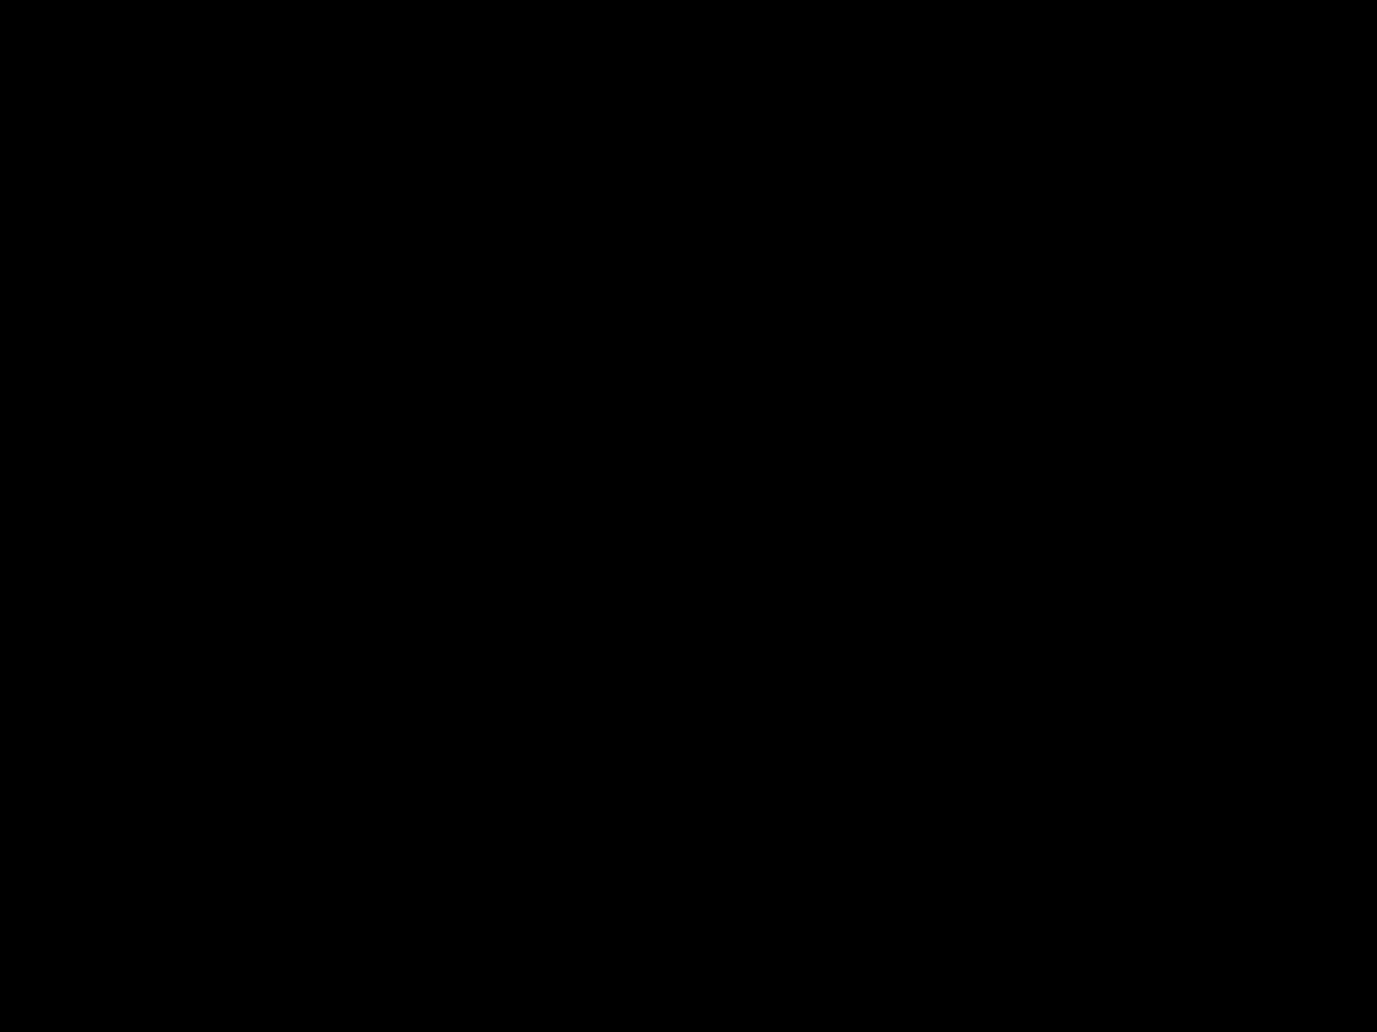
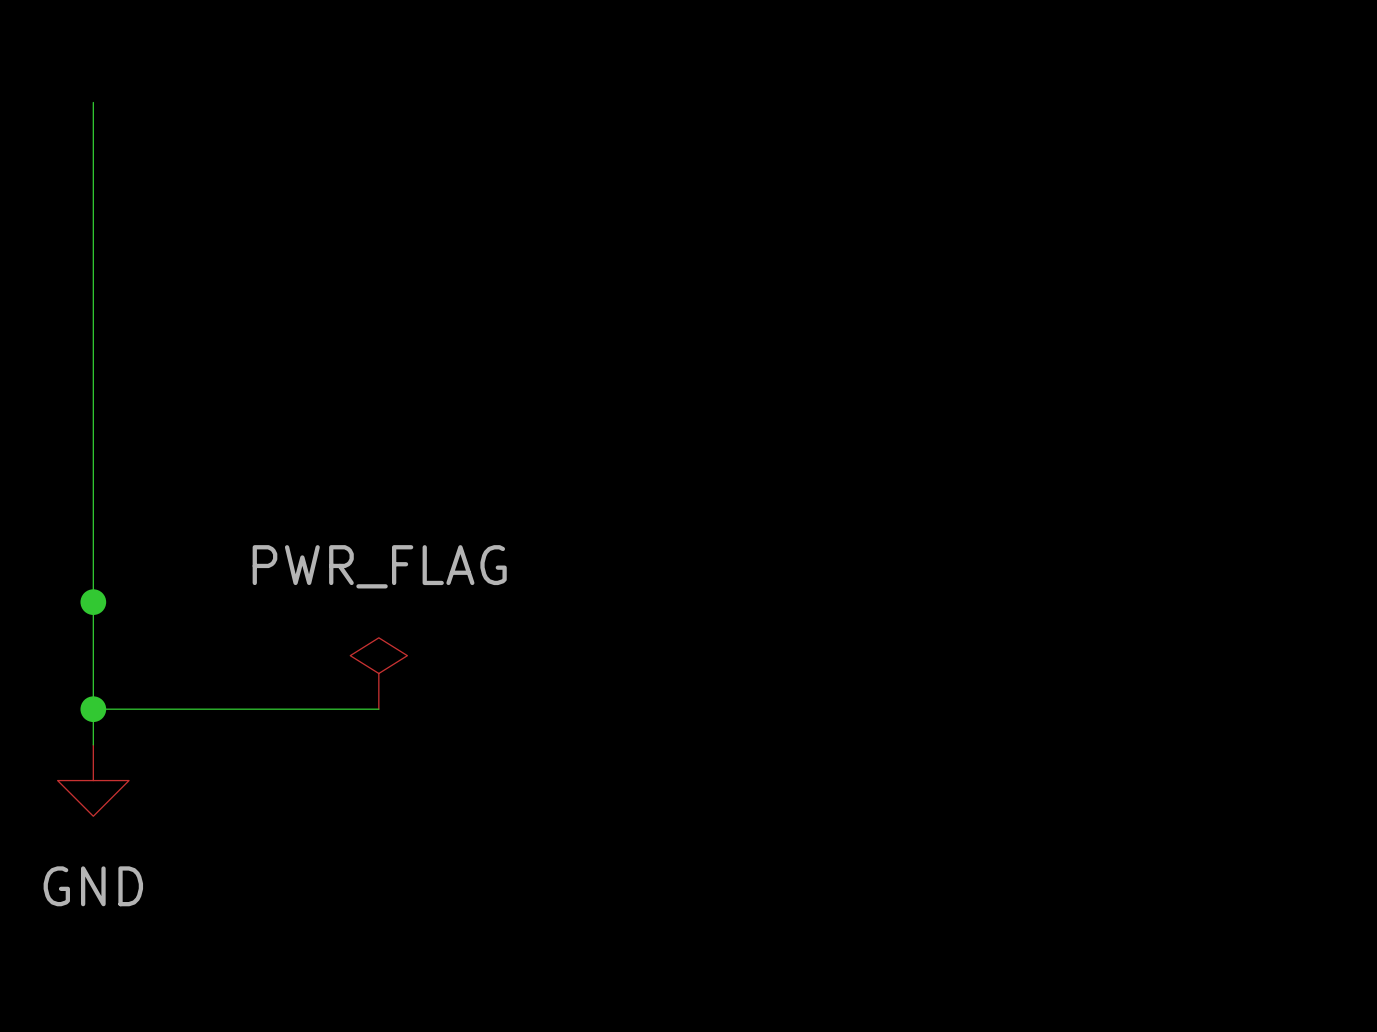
wire: none -> (93, 102) (93, 744)
junction: none -> (93, 602)
power symbol: none -> PWR_FLAG (378, 673)
wire: none -> (93, 709) (378, 709)
junction: none -> (93, 709)
power symbol: none -> GND (93, 780)

